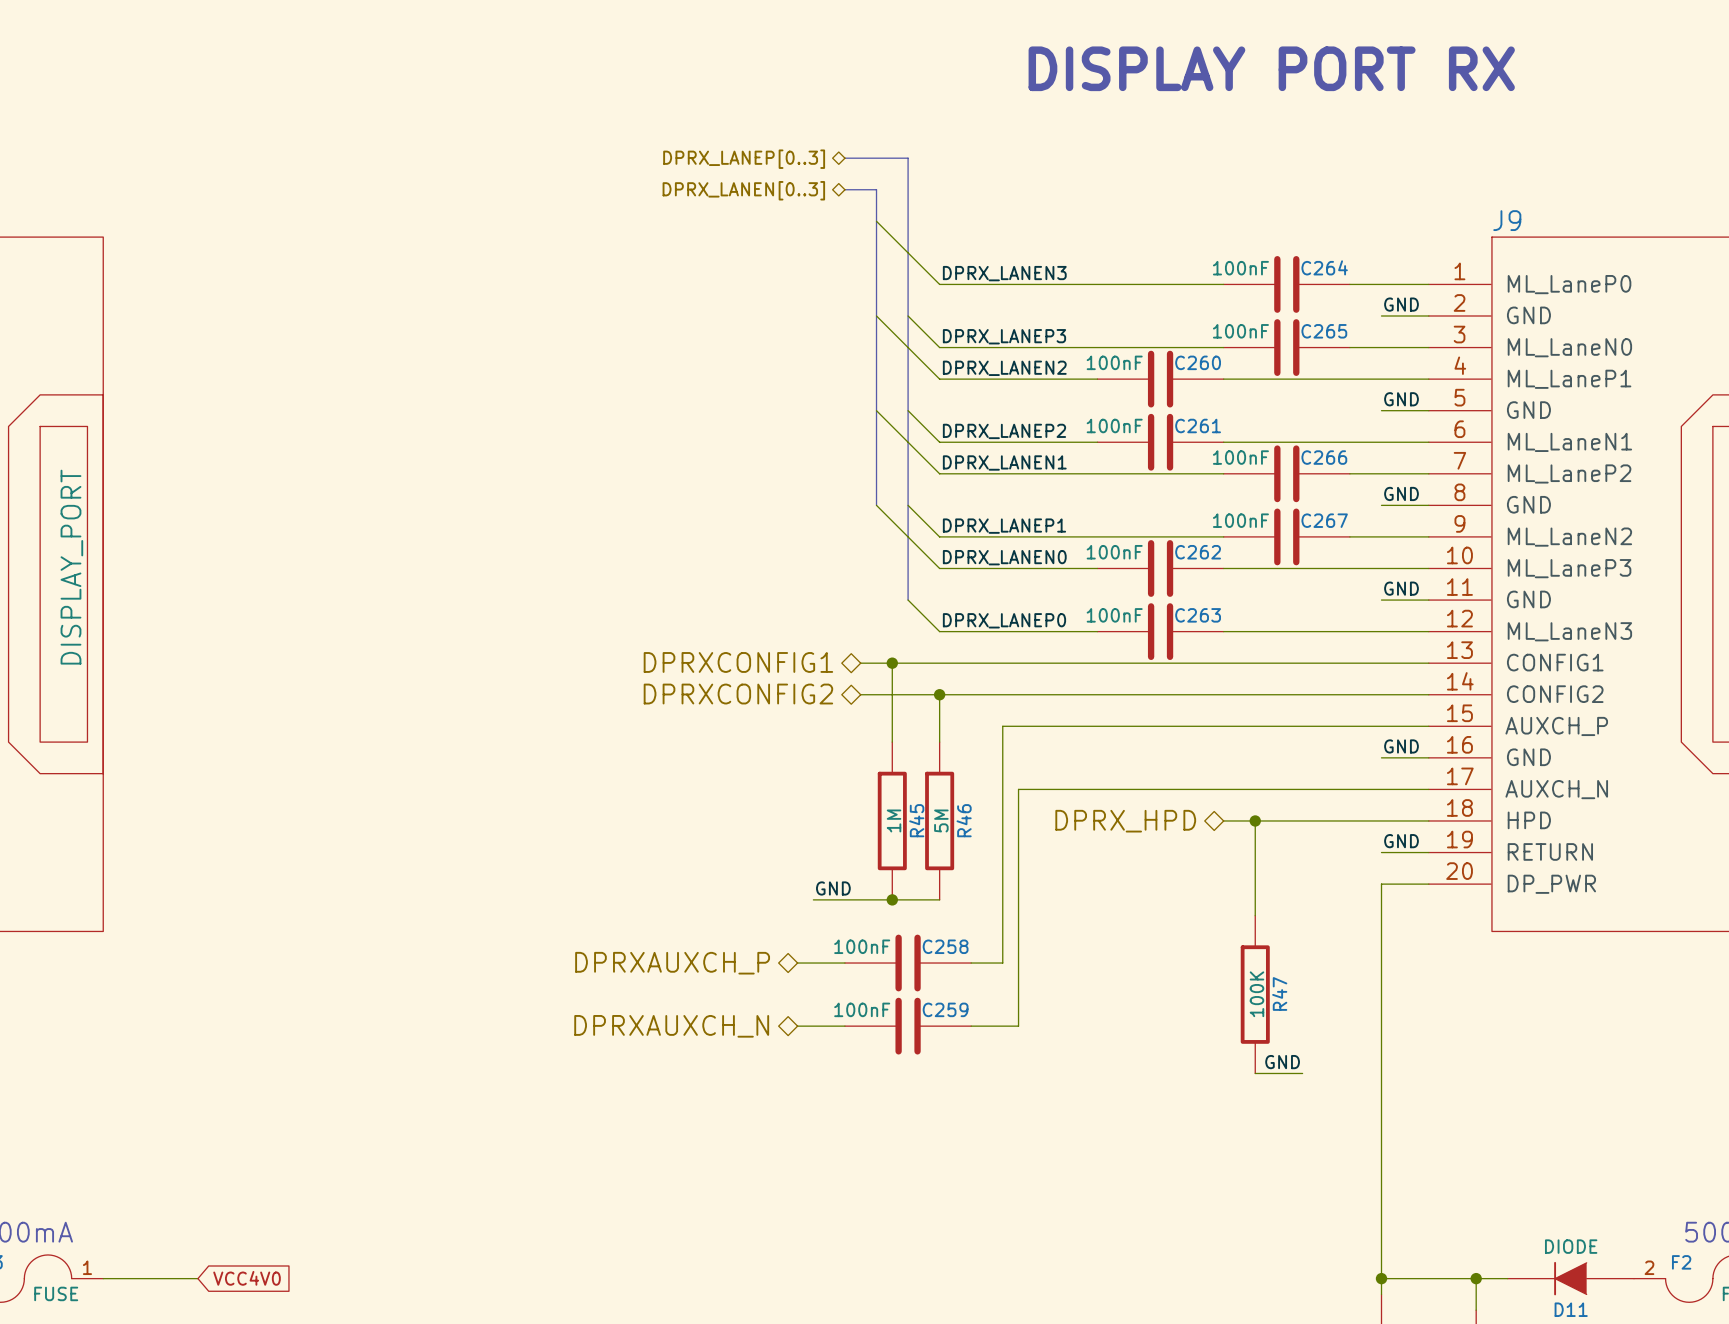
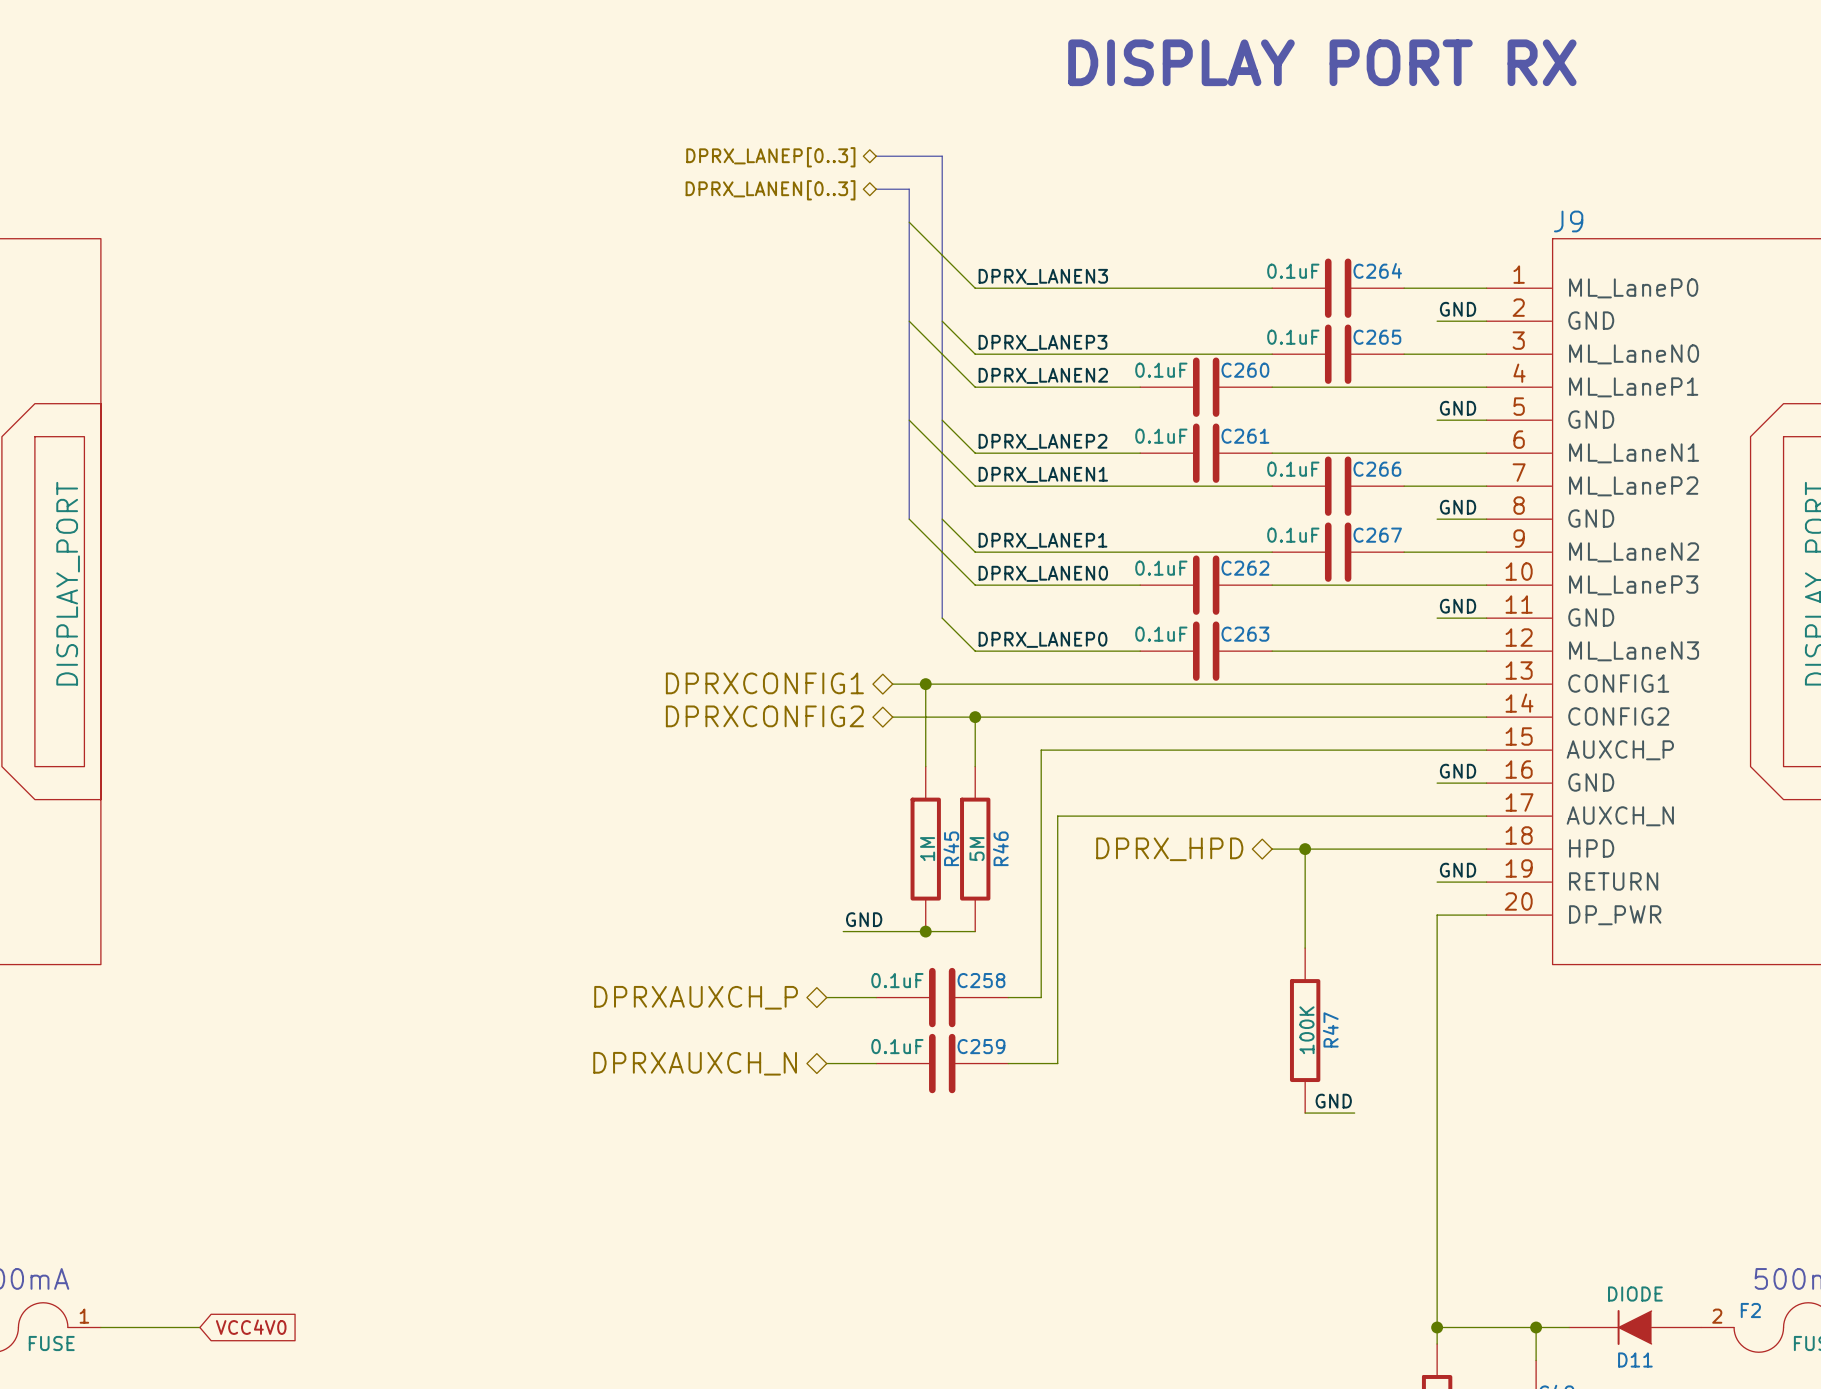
C264 value: 100nF (1240, 268) -> 0.1uF (1293, 271)
C265 value: 100nF (1240, 331) -> 0.1uF (1293, 337)
C260 value: 100nF (1114, 362) -> 0.1uF (1161, 370)
C261 value: 100nF (1114, 425) -> 0.1uF (1161, 436)
C266 value: 100nF (1240, 457) -> 0.1uF (1293, 469)
C267 value: 100nF (1240, 520) -> 0.1uF (1293, 535)
C262 value: 100nF (1114, 552) -> 0.1uF (1161, 568)
C263 value: 100nF (1114, 615) -> 0.1uF (1161, 634)
C258 value: 100nF (862, 946) -> 0.1uF (897, 980)
C259 value: 100nF (862, 1009) -> 0.1uF (897, 1046)

